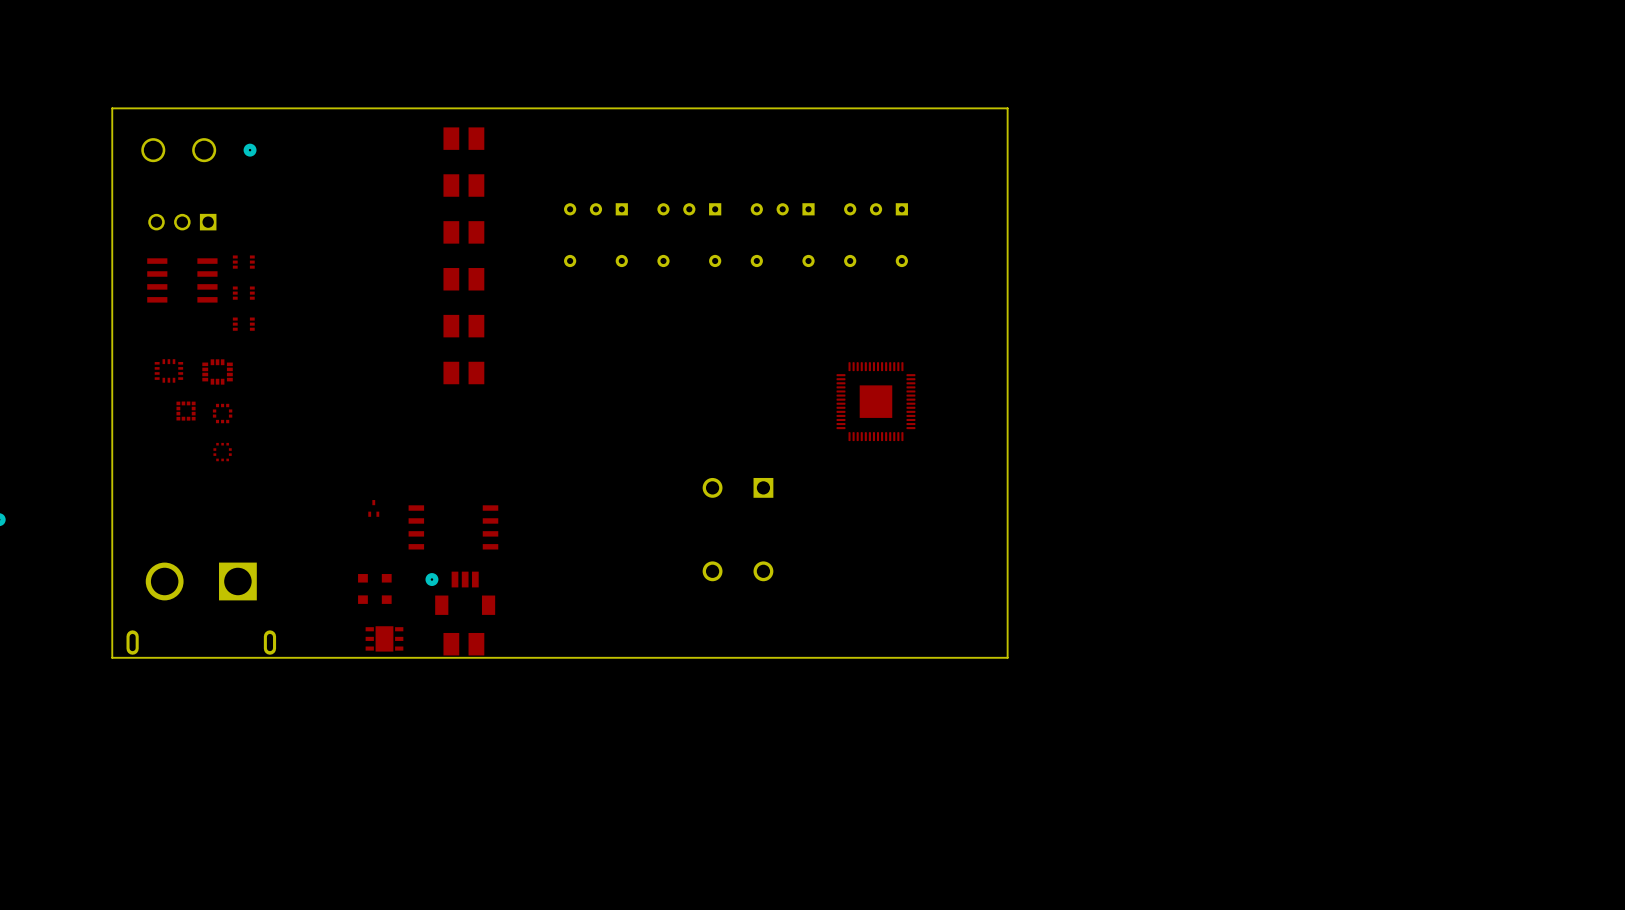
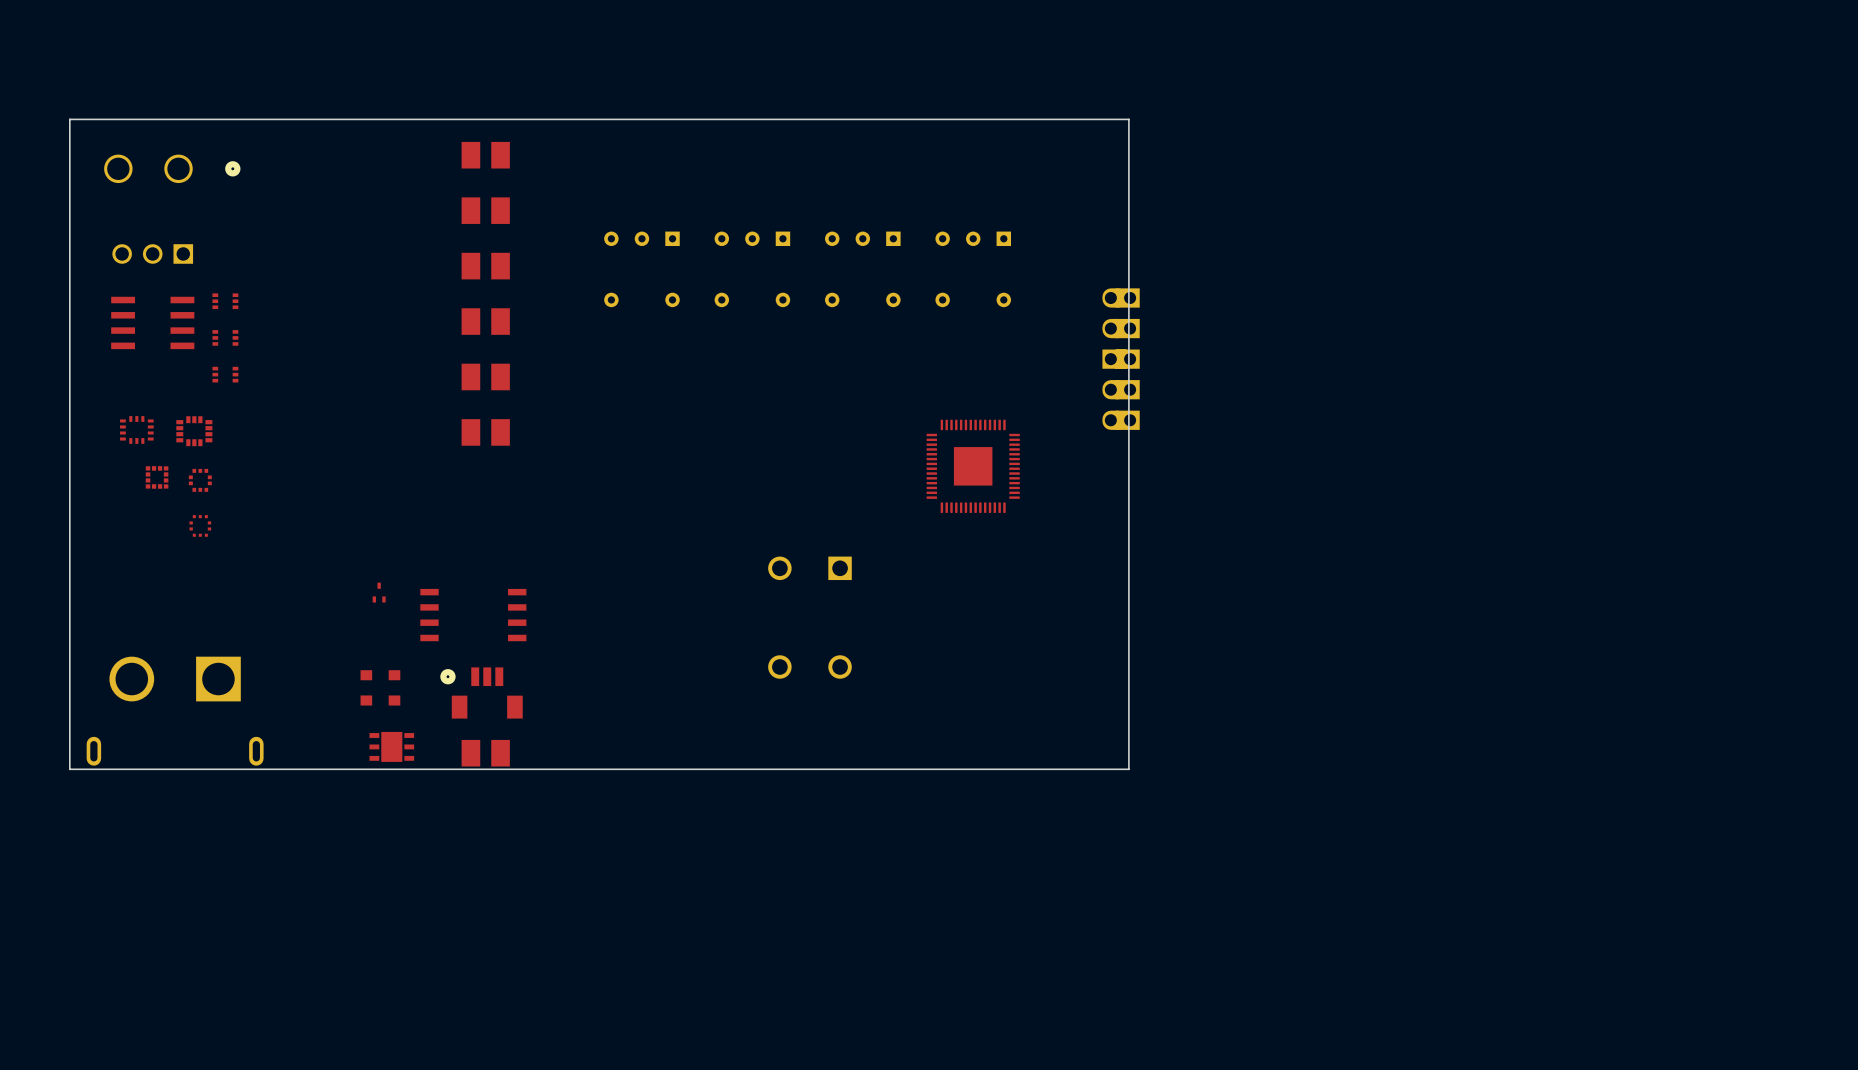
part: none -> (1121, 359)

